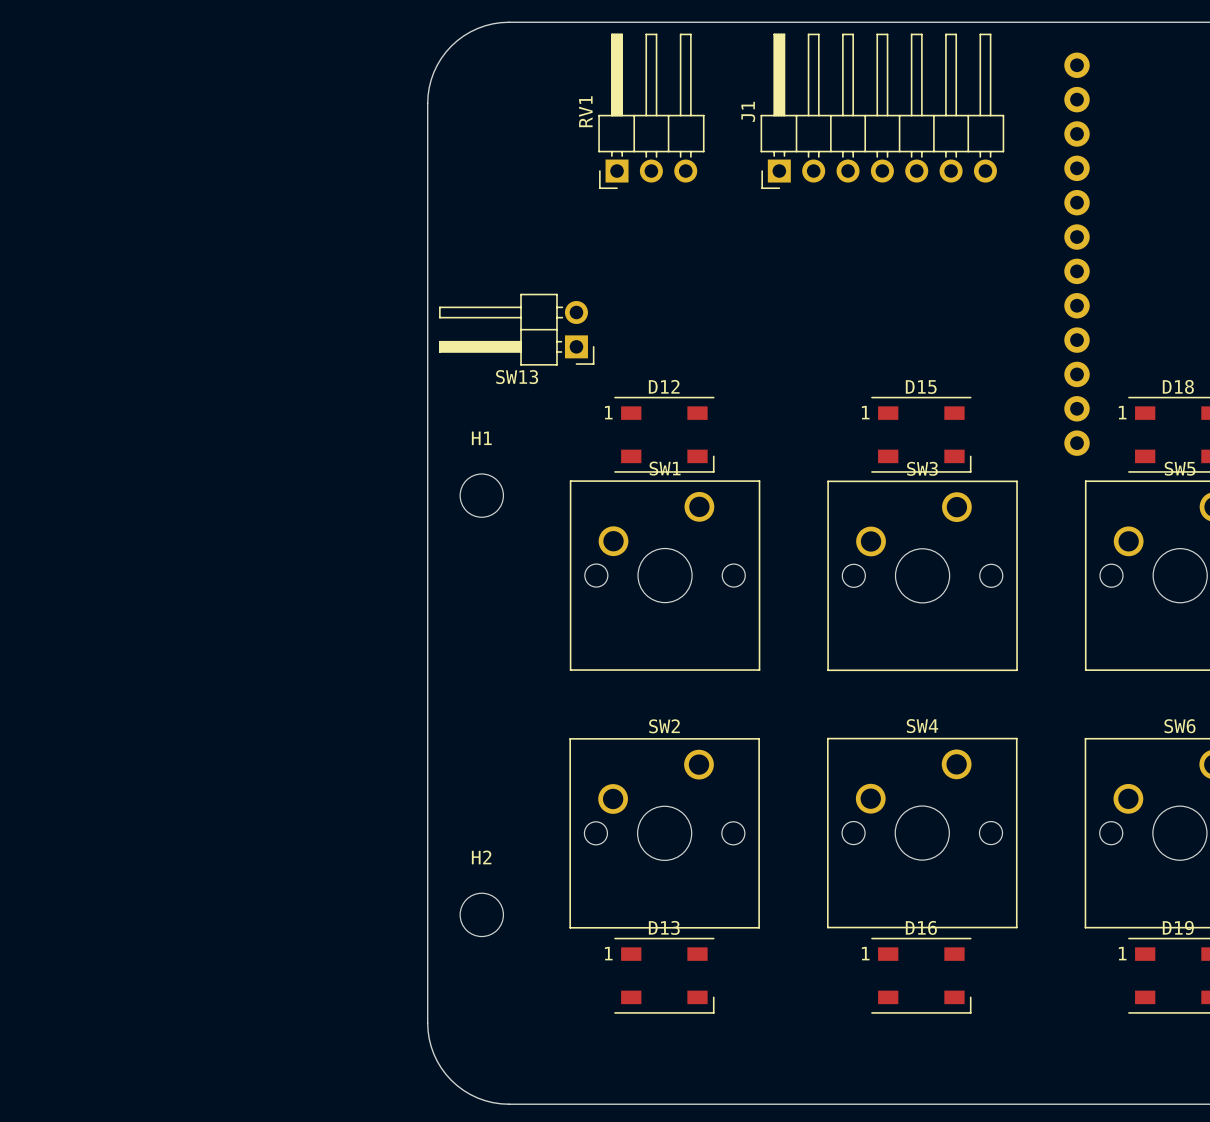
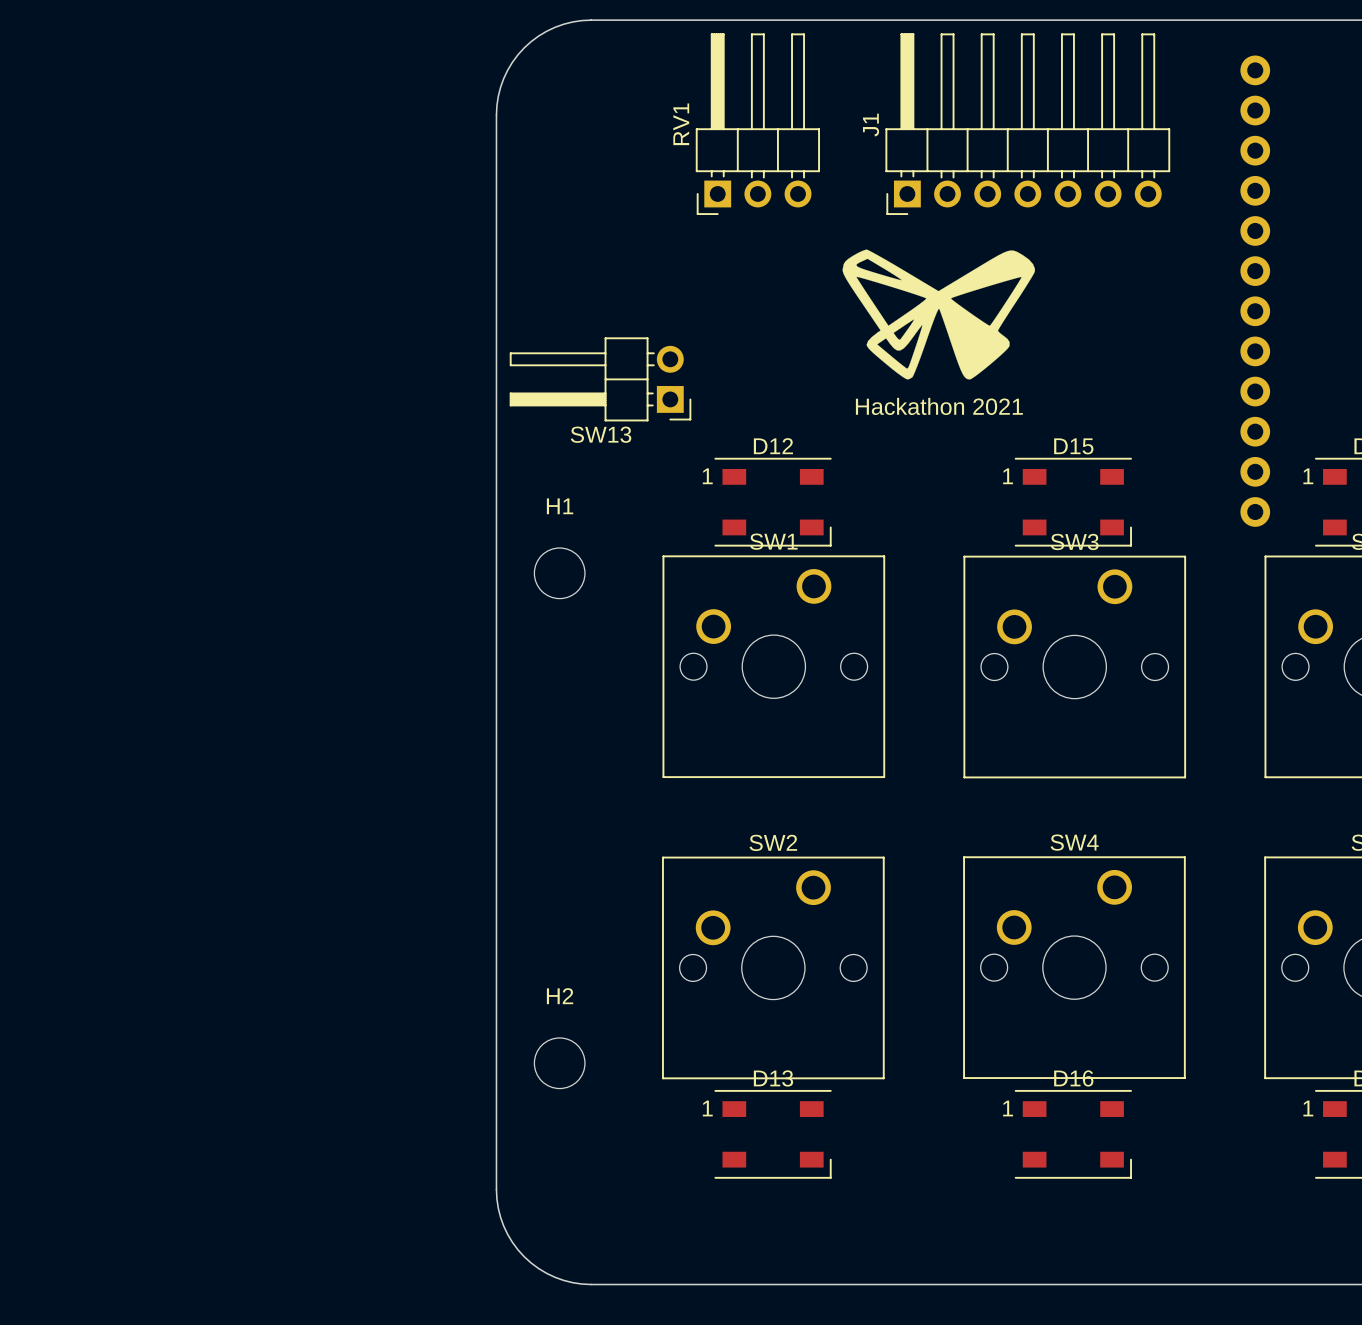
drawing: none -> [842, 249, 1036, 380]
text: none -> Hackathon 2021 (939, 406)

